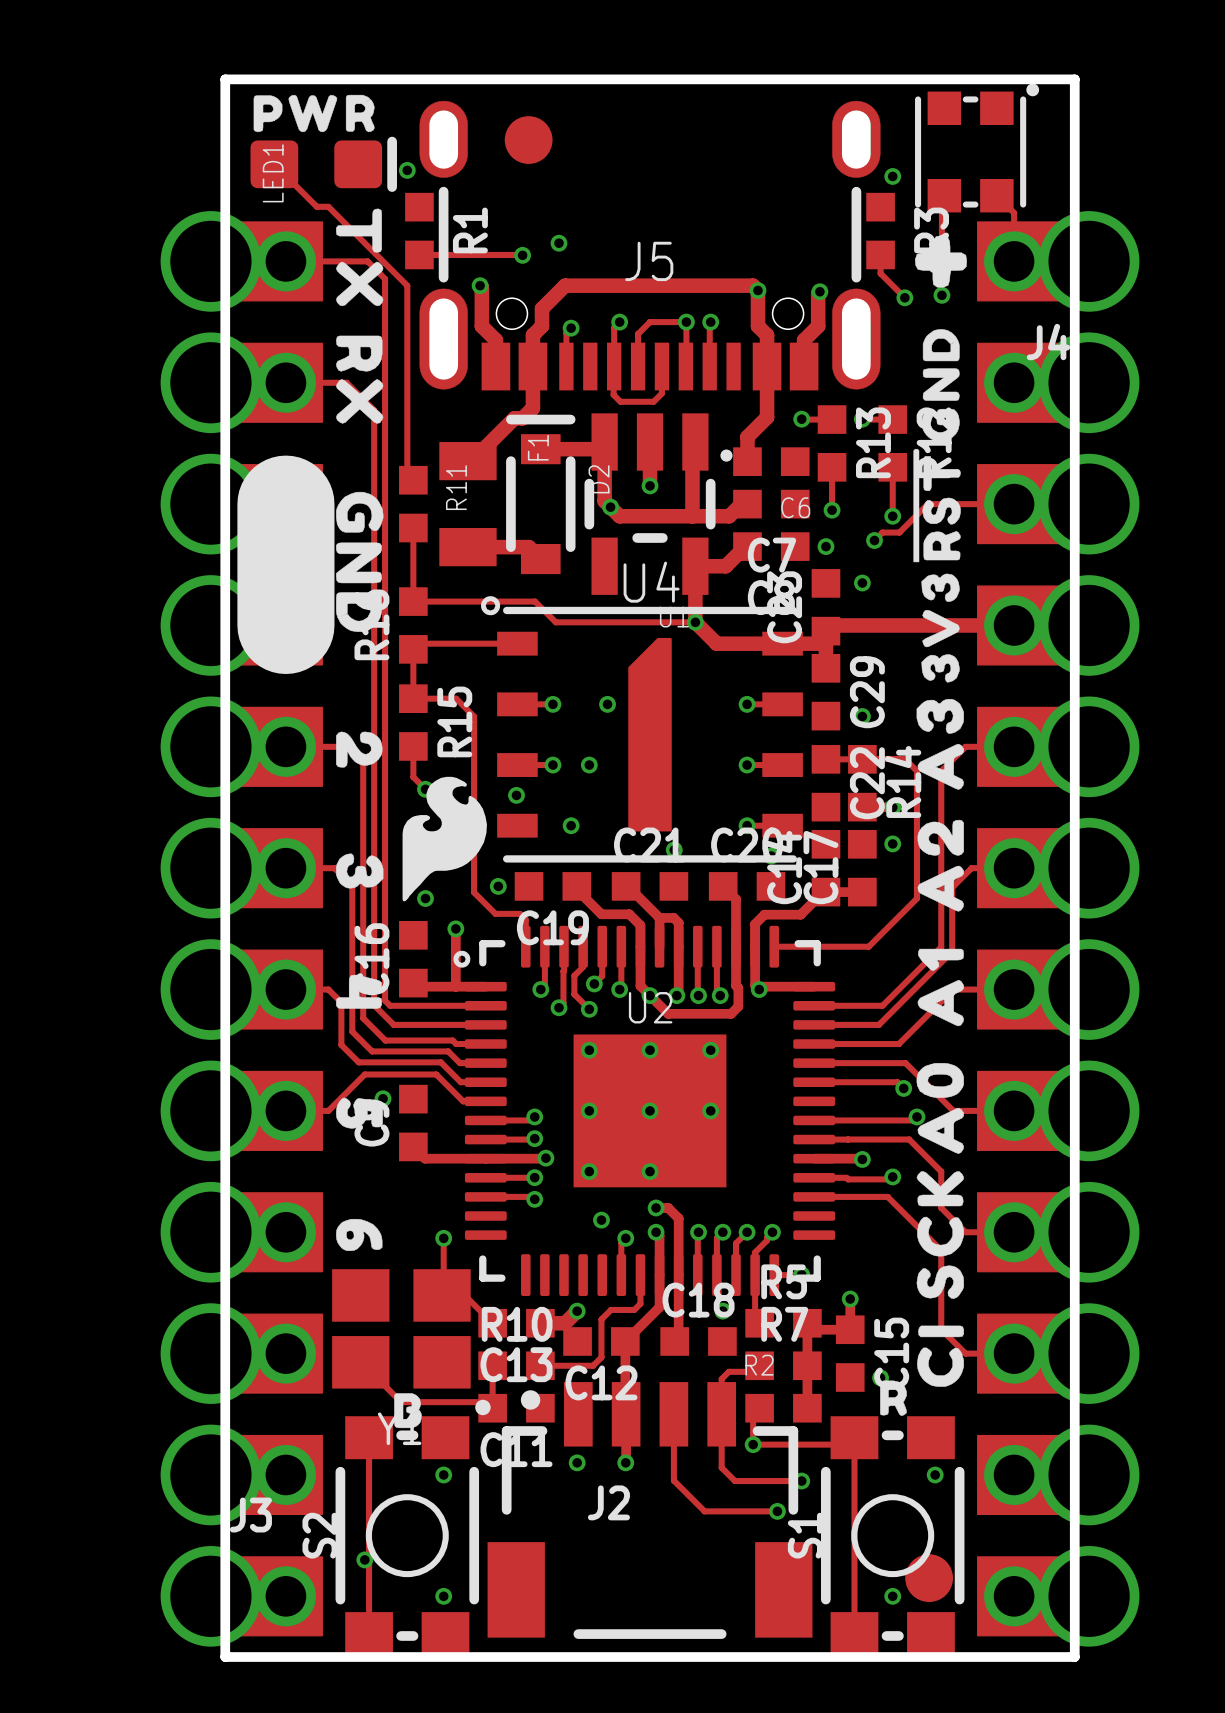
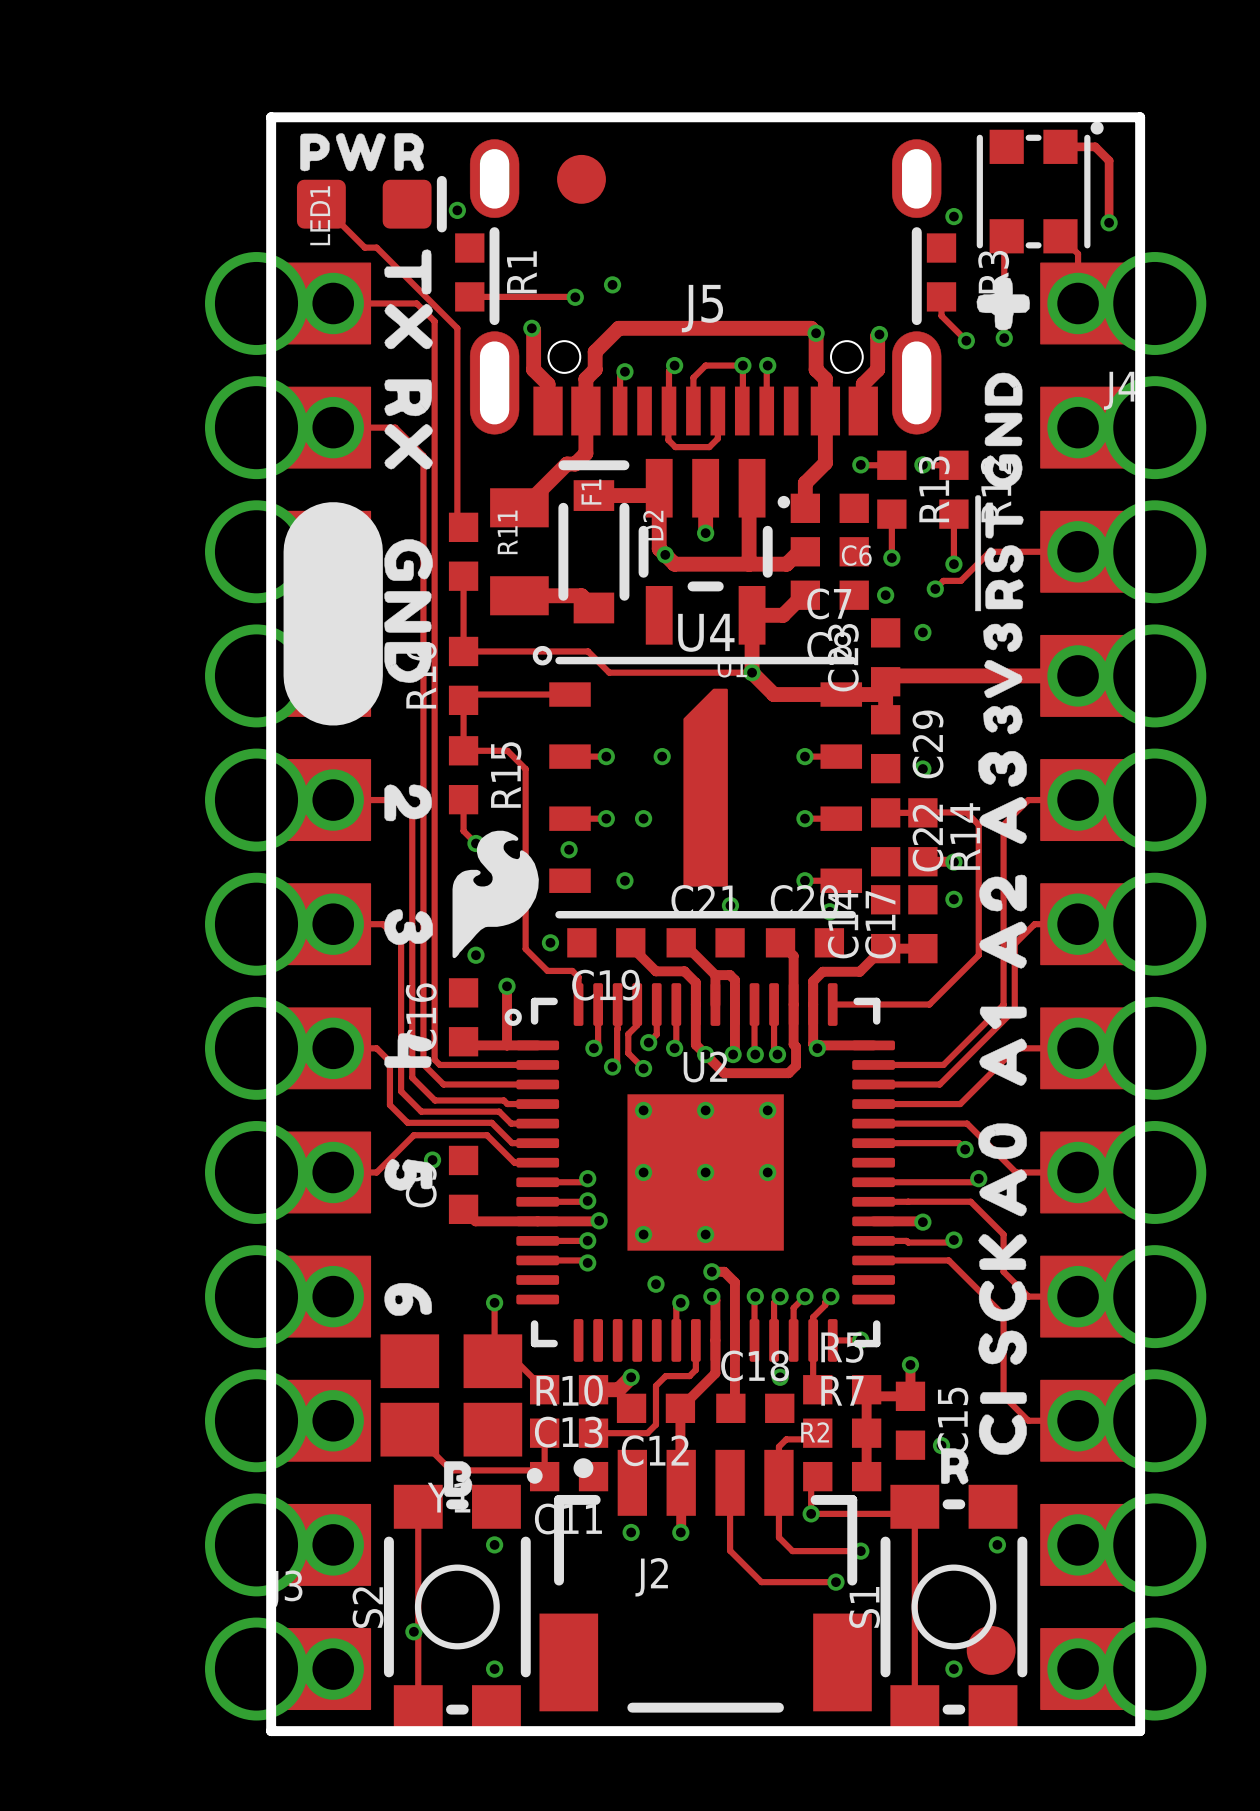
track: none -> (1060, 146) (1095, 146) (1109, 160) (1109, 222)
via: none -> (1109, 222)

